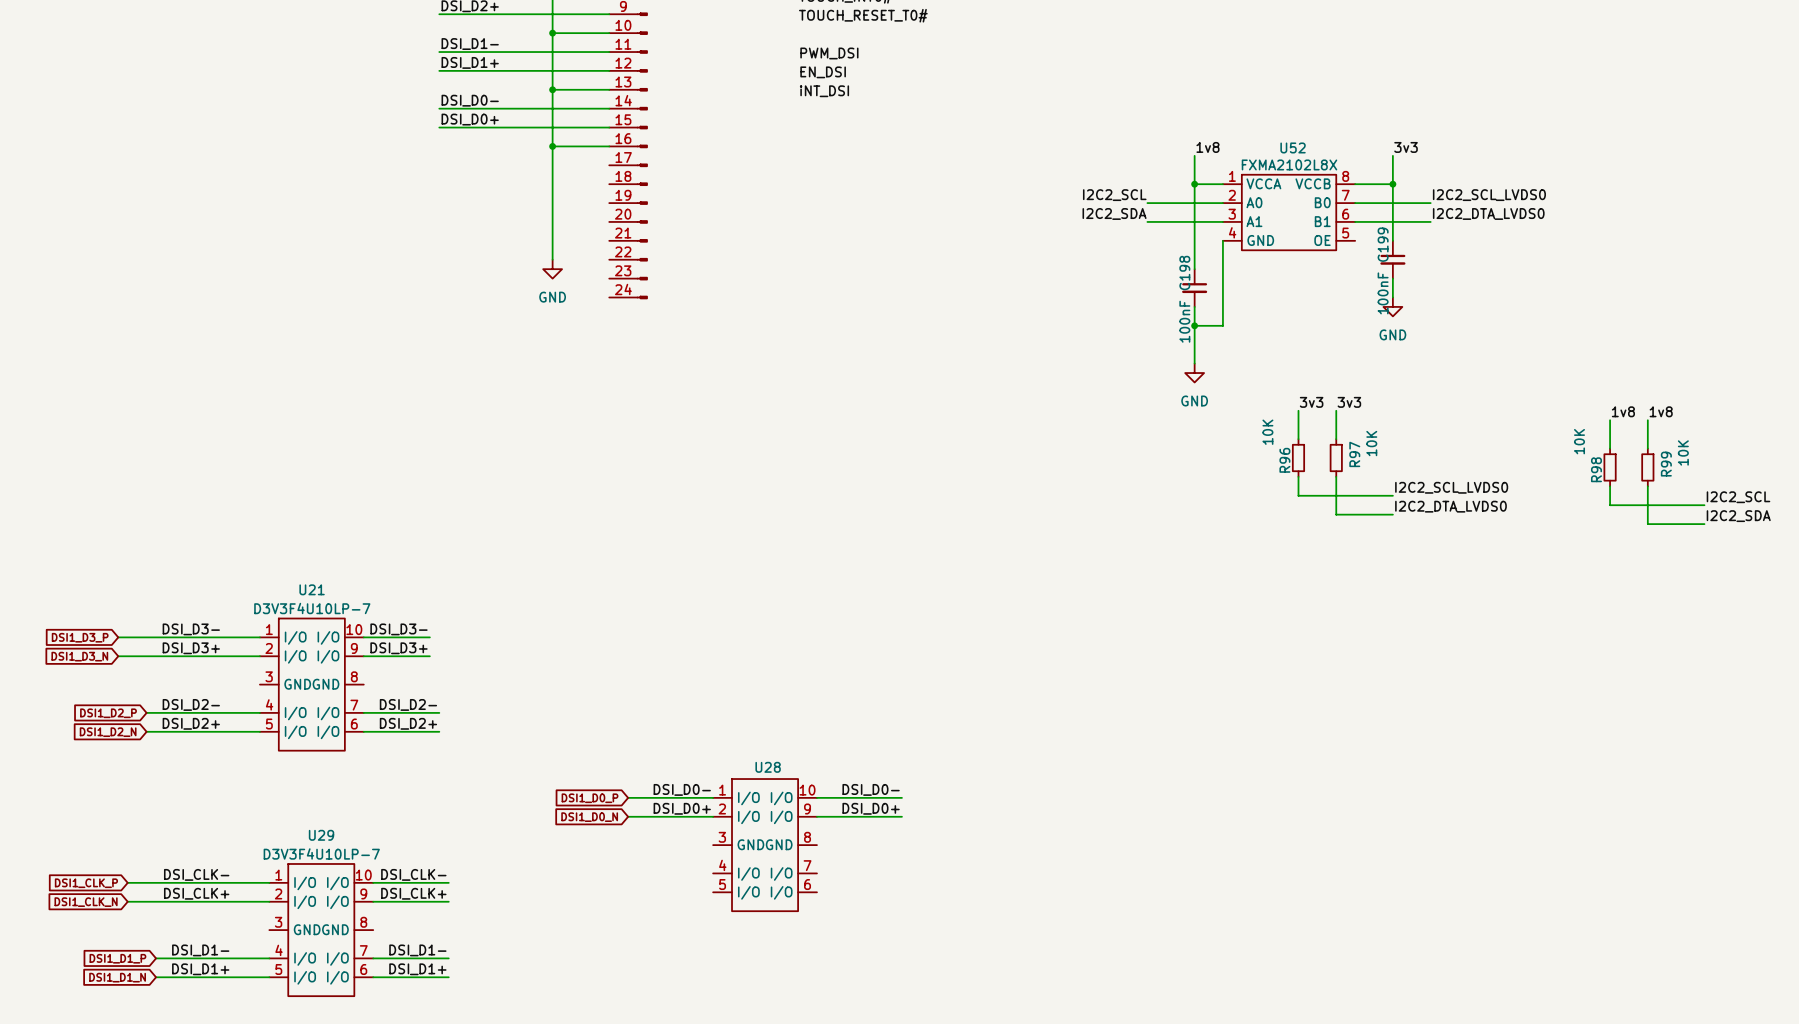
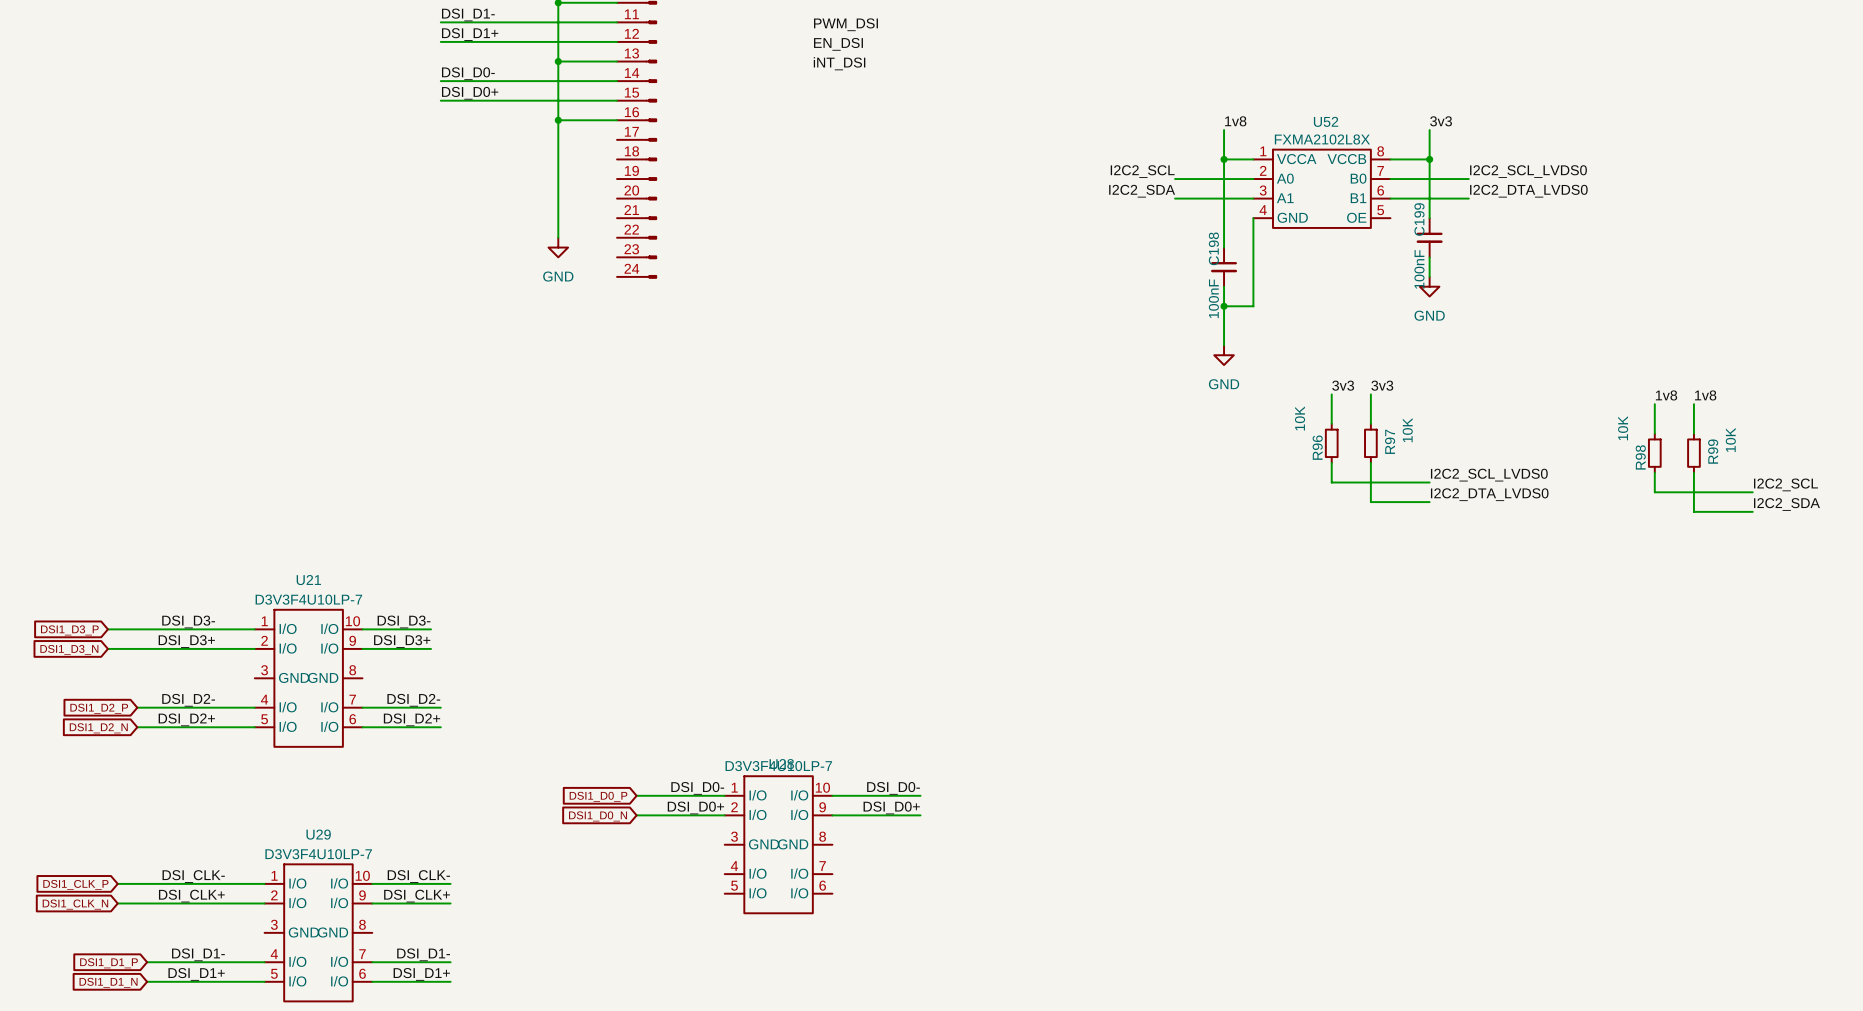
U28 value: none -> D3V3F4U10LP-7 (778, 766)

